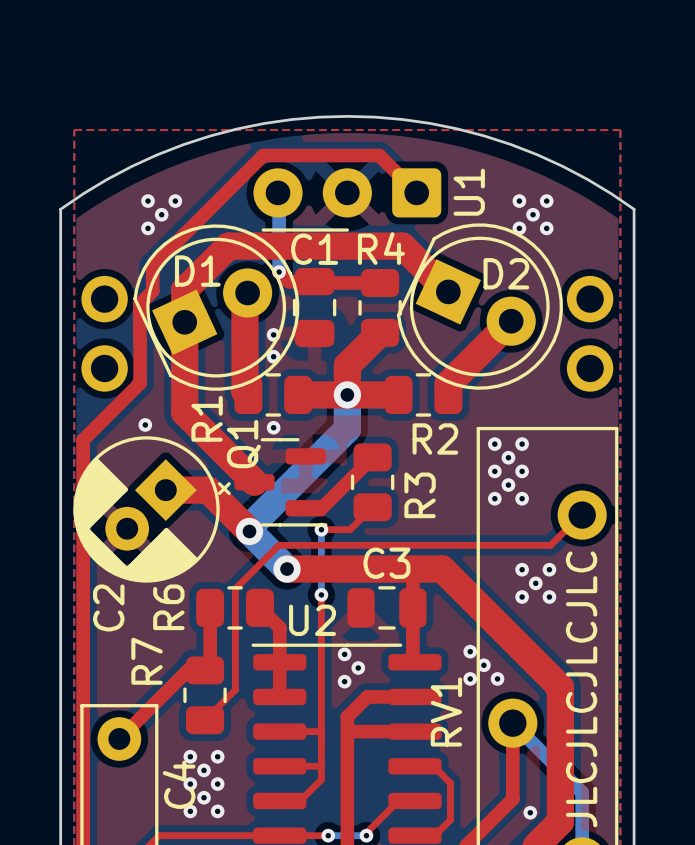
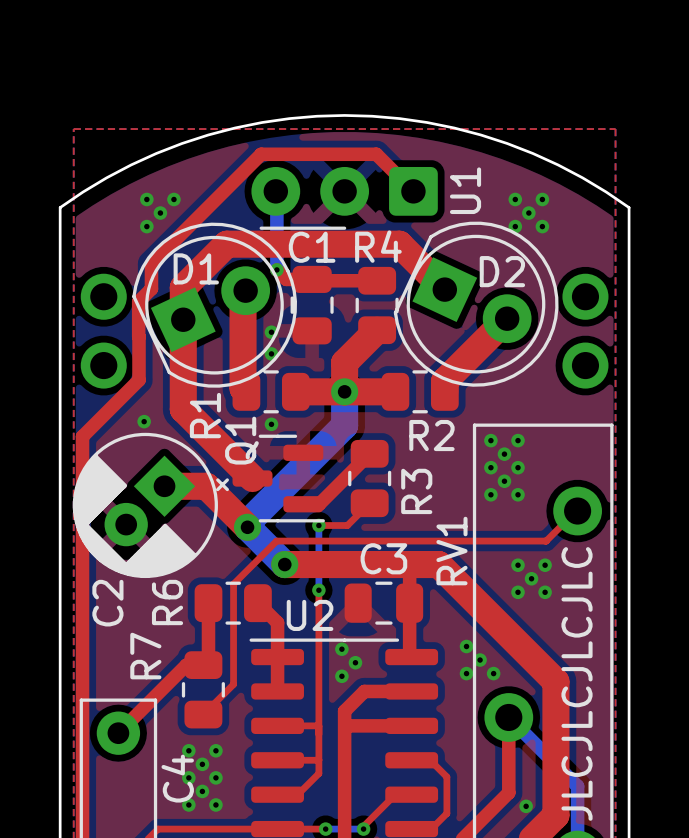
RV1 name position: RV1 (446, 712) -> RV1 (451, 551)

